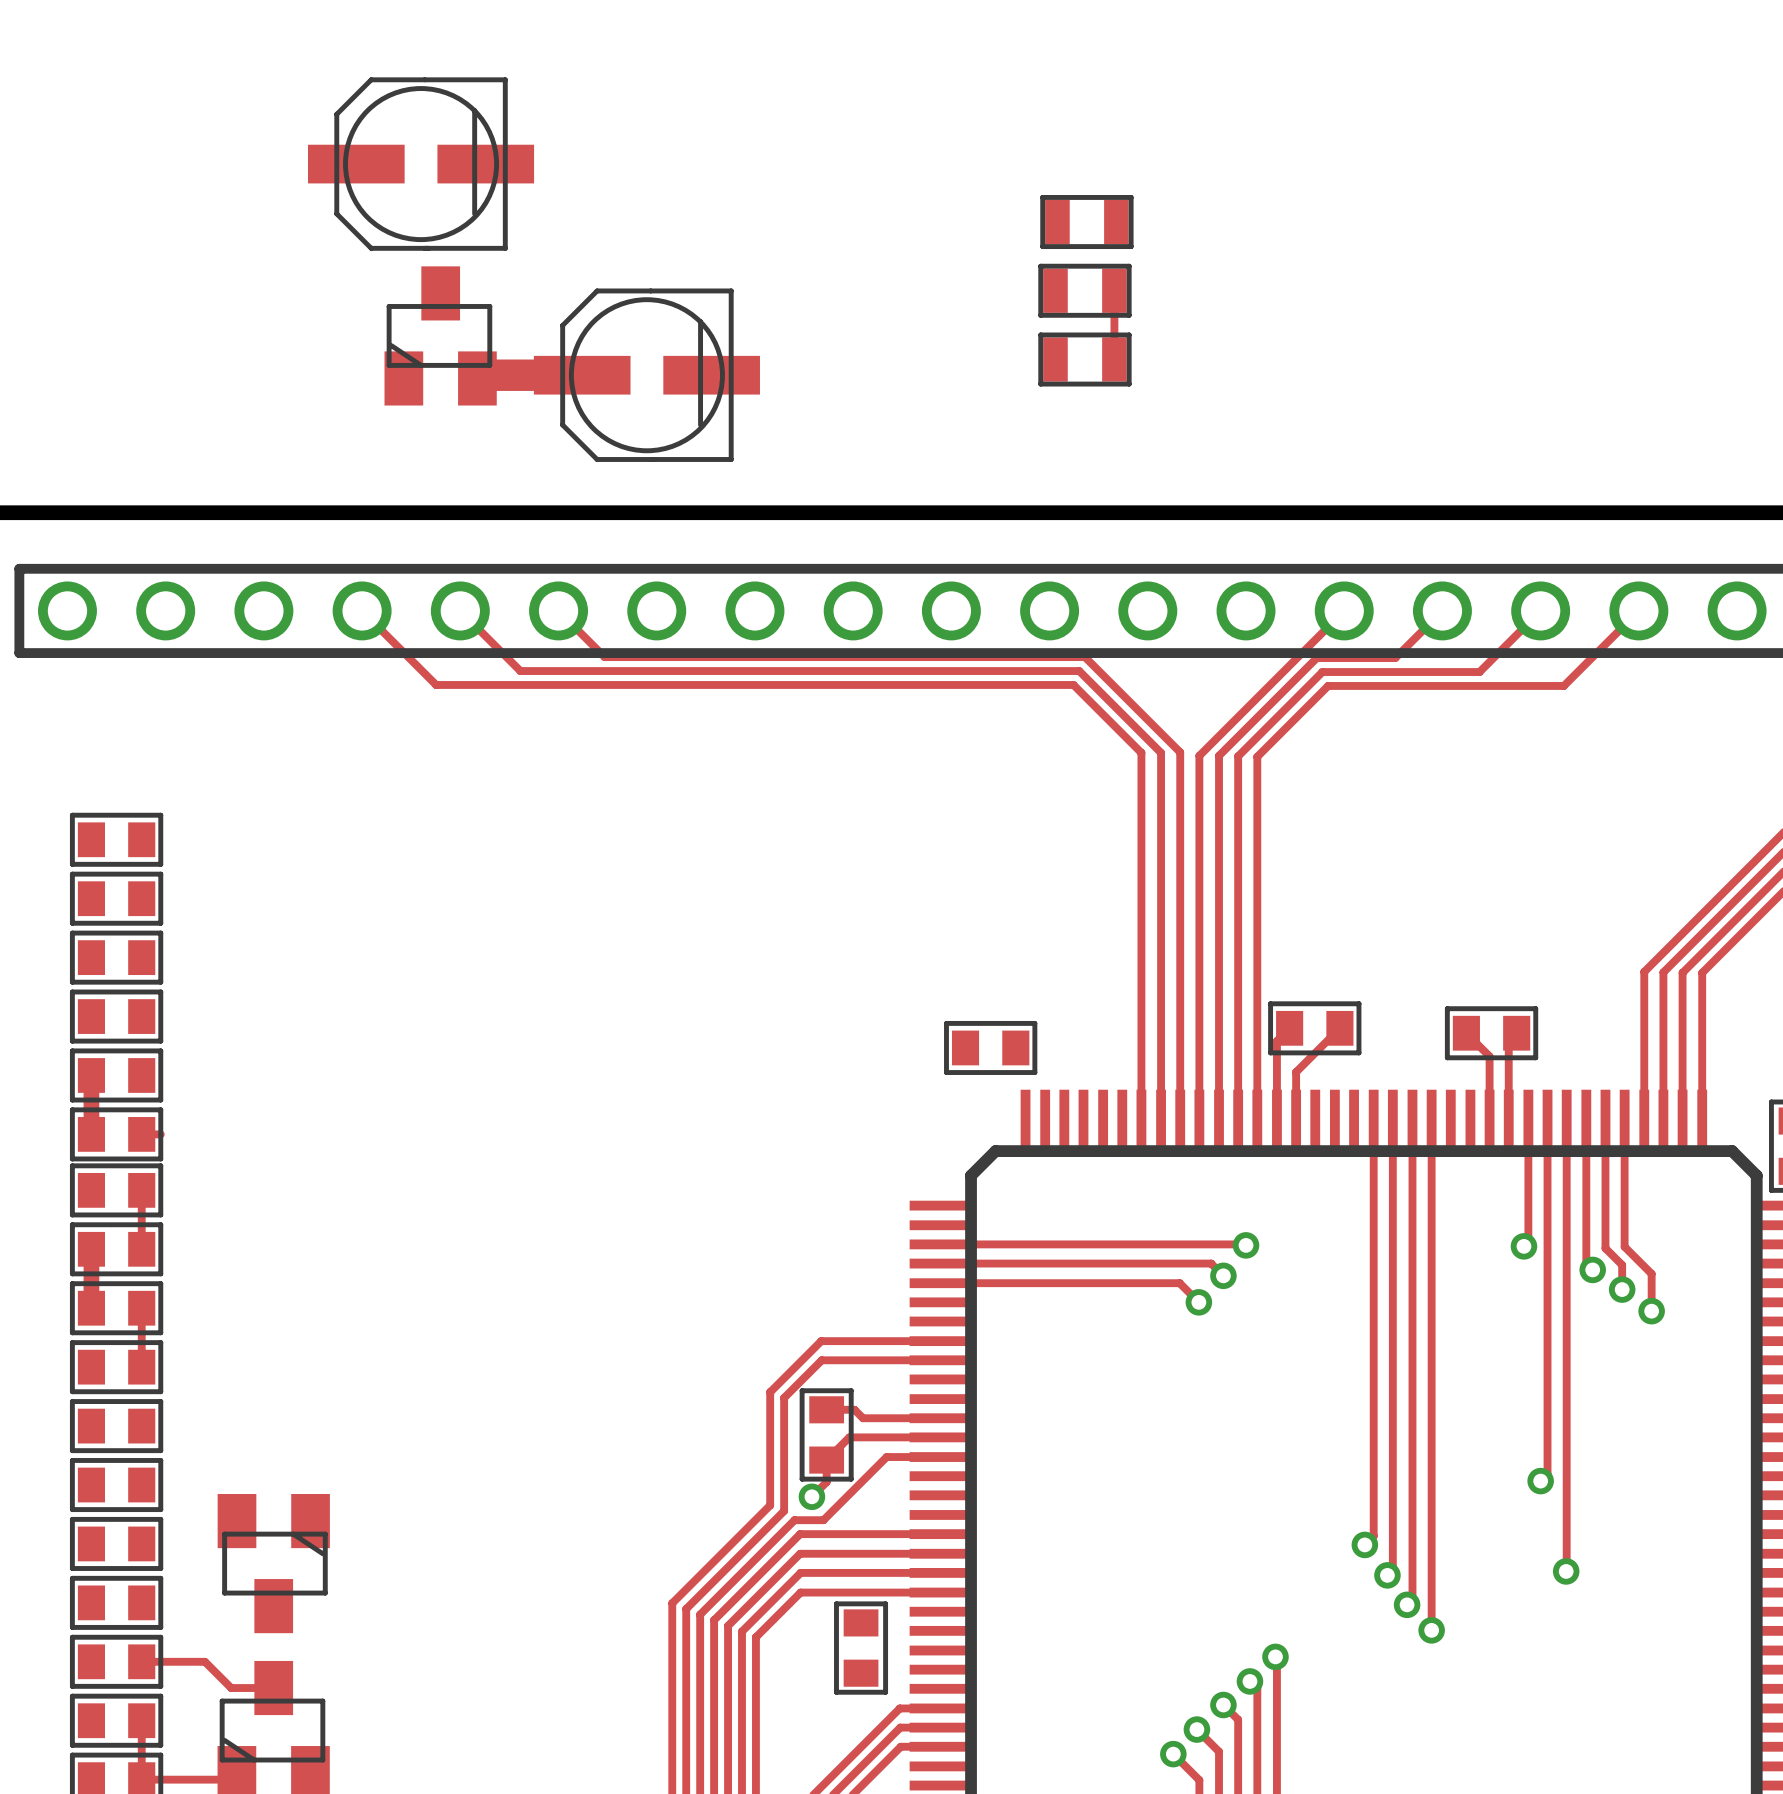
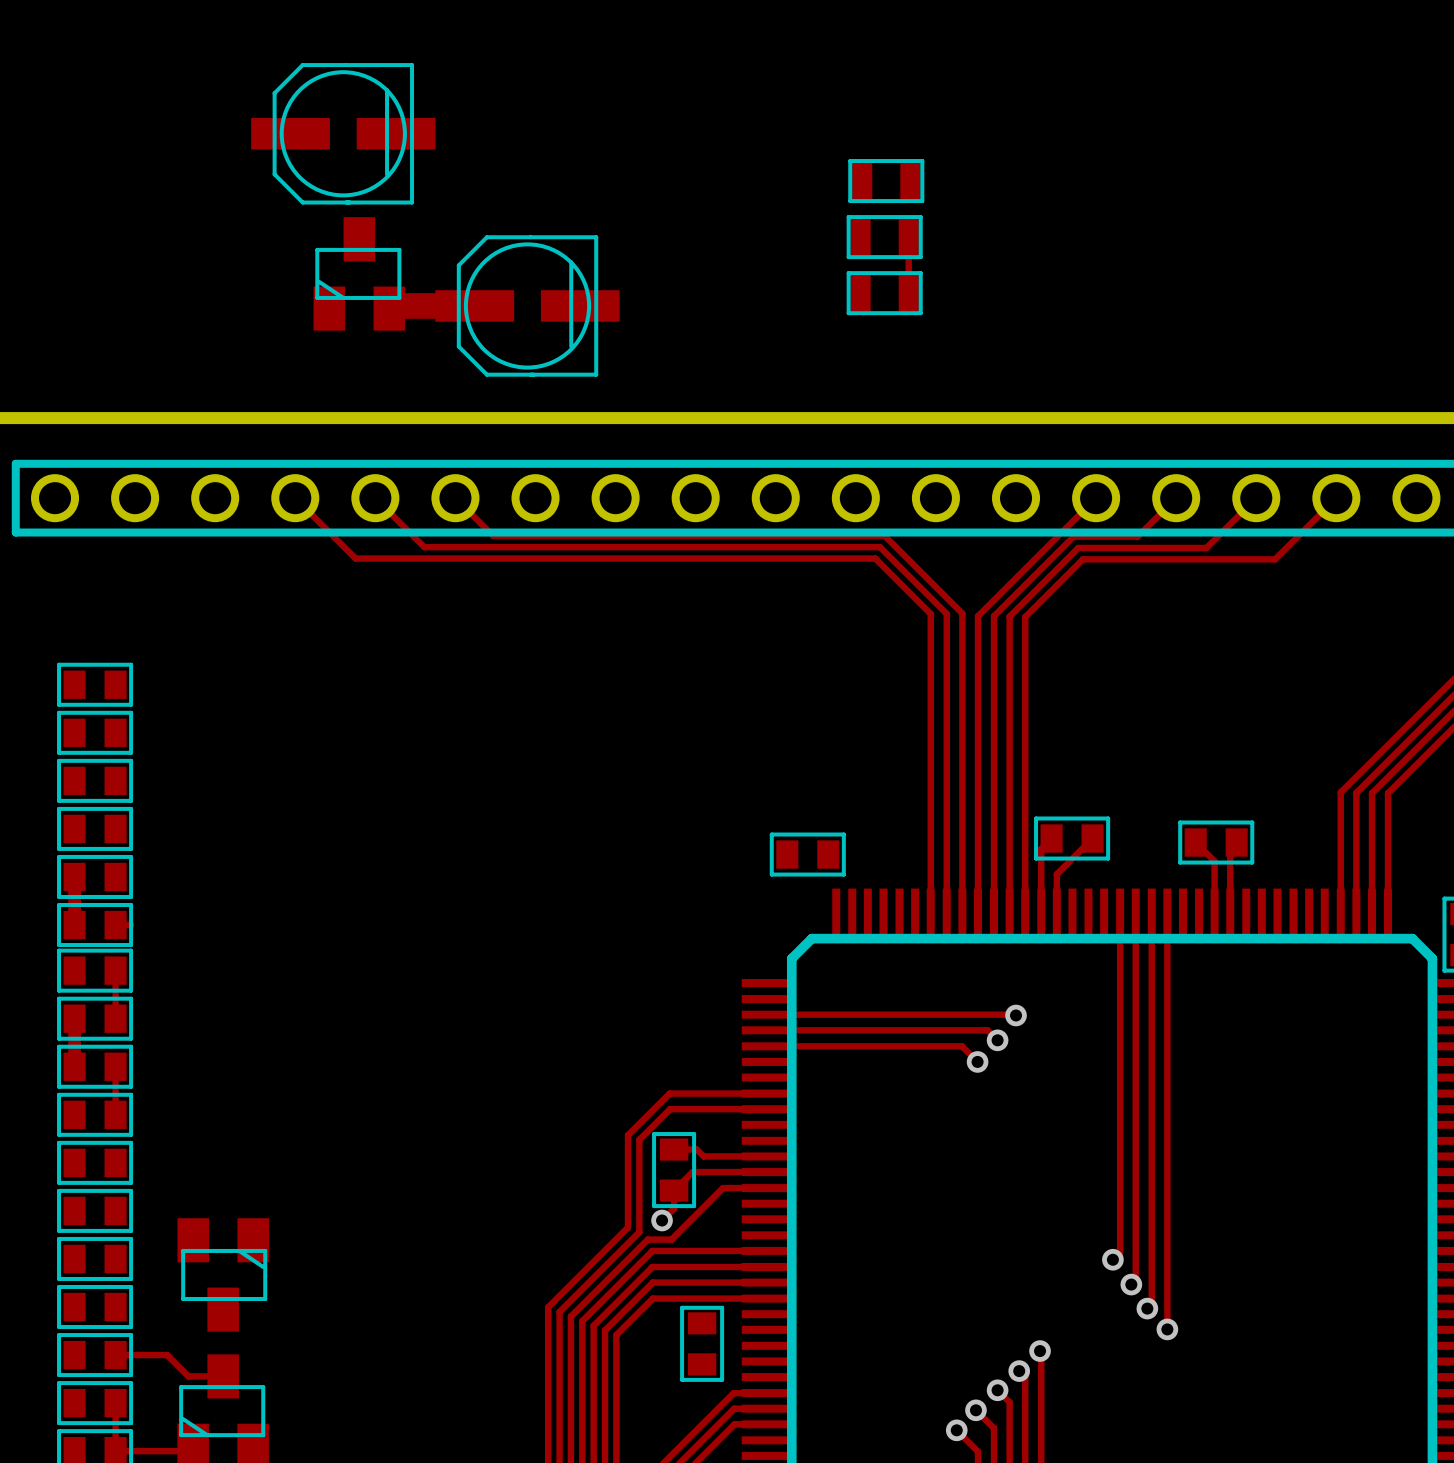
track: (1528, 1119) (1528, 1241) (1523, 1246) -> none
track: (1547, 1119) (1547, 1474) (1540, 1481) -> none
track: (1566, 1119) (1566, 1570) -> none
track: (1586, 1119) (1586, 1263) (1592, 1269) -> none
track: (1605, 1119) (1605, 1248) (1622, 1265) (1622, 1289) -> none
track: (1624, 1119) (1624, 1246) (1651, 1273) (1651, 1311) -> none
via: (1523, 1246) -> none
via: (1592, 1269) -> none
via: (1622, 1289) -> none
via: (1651, 1311) -> none
via: (1540, 1481) -> none
via: (1566, 1571) -> none

